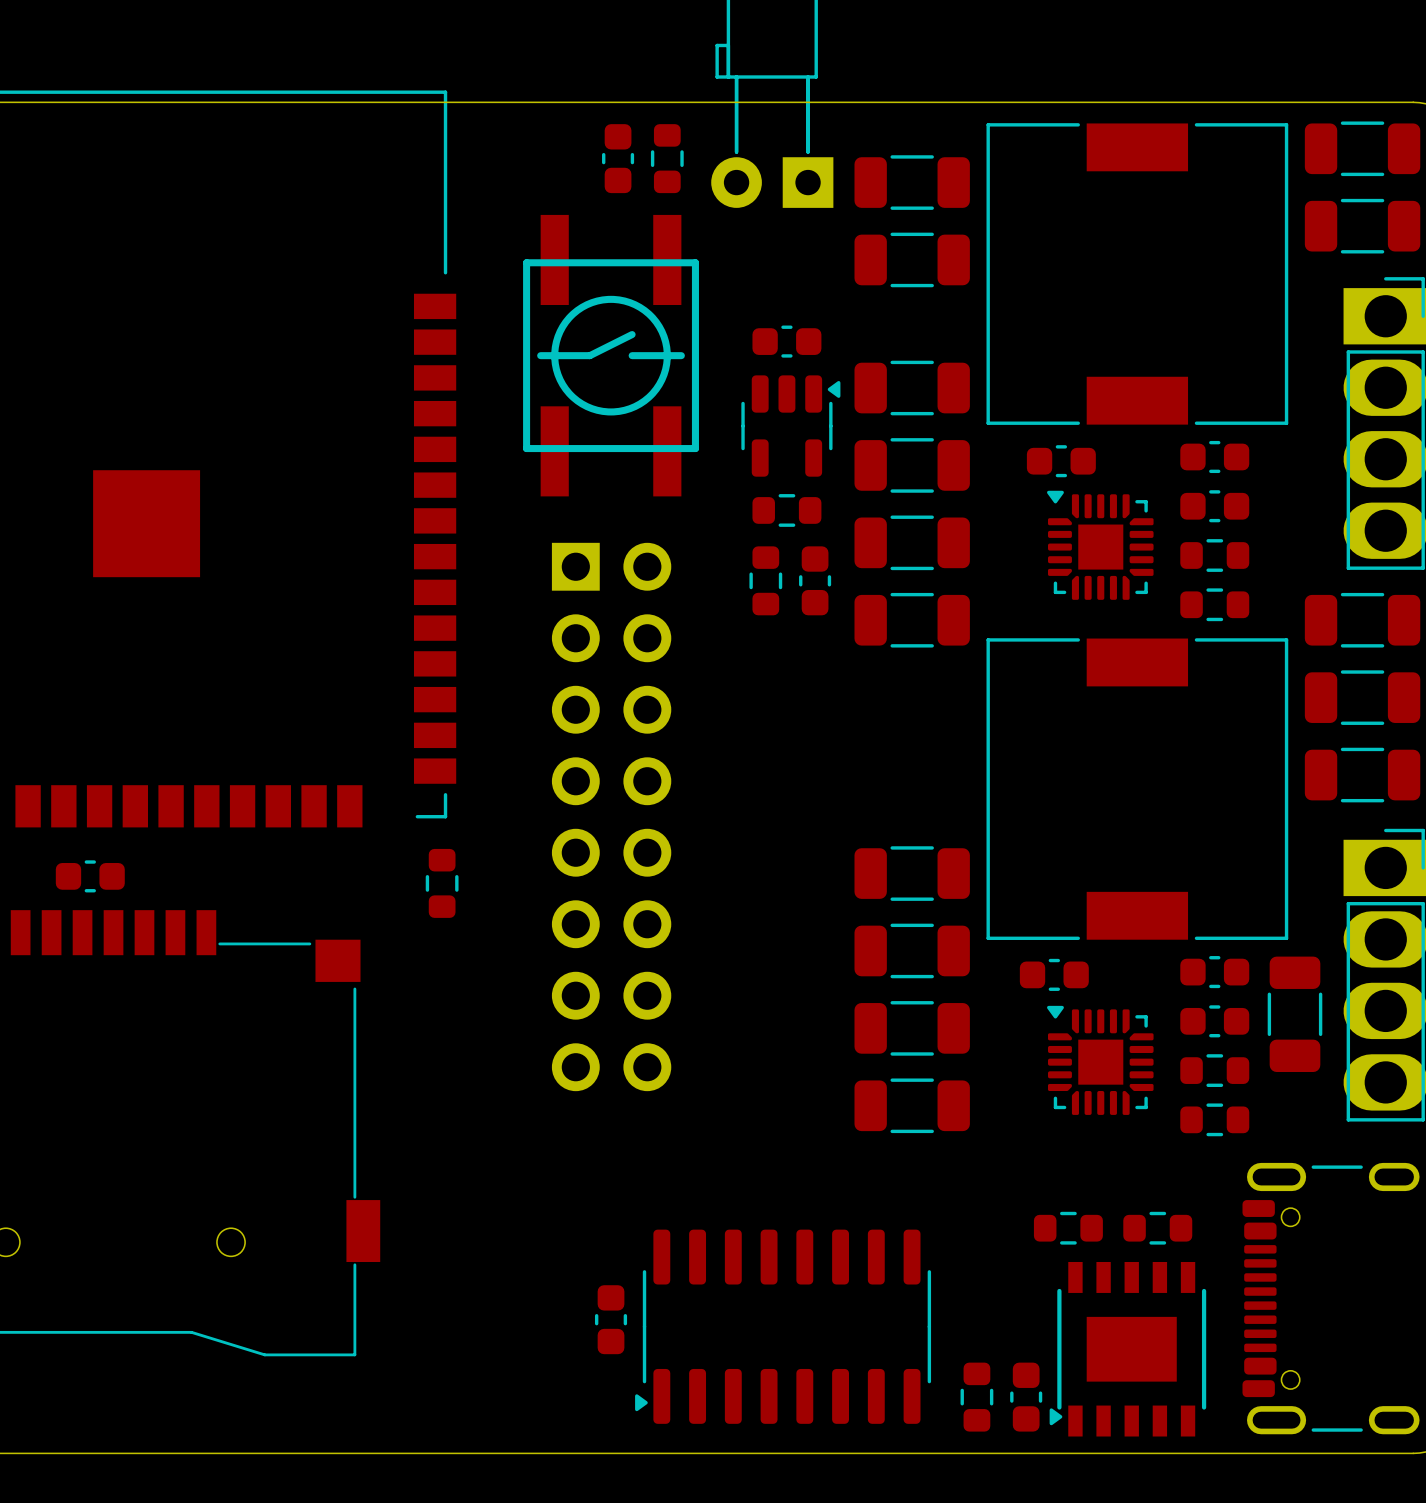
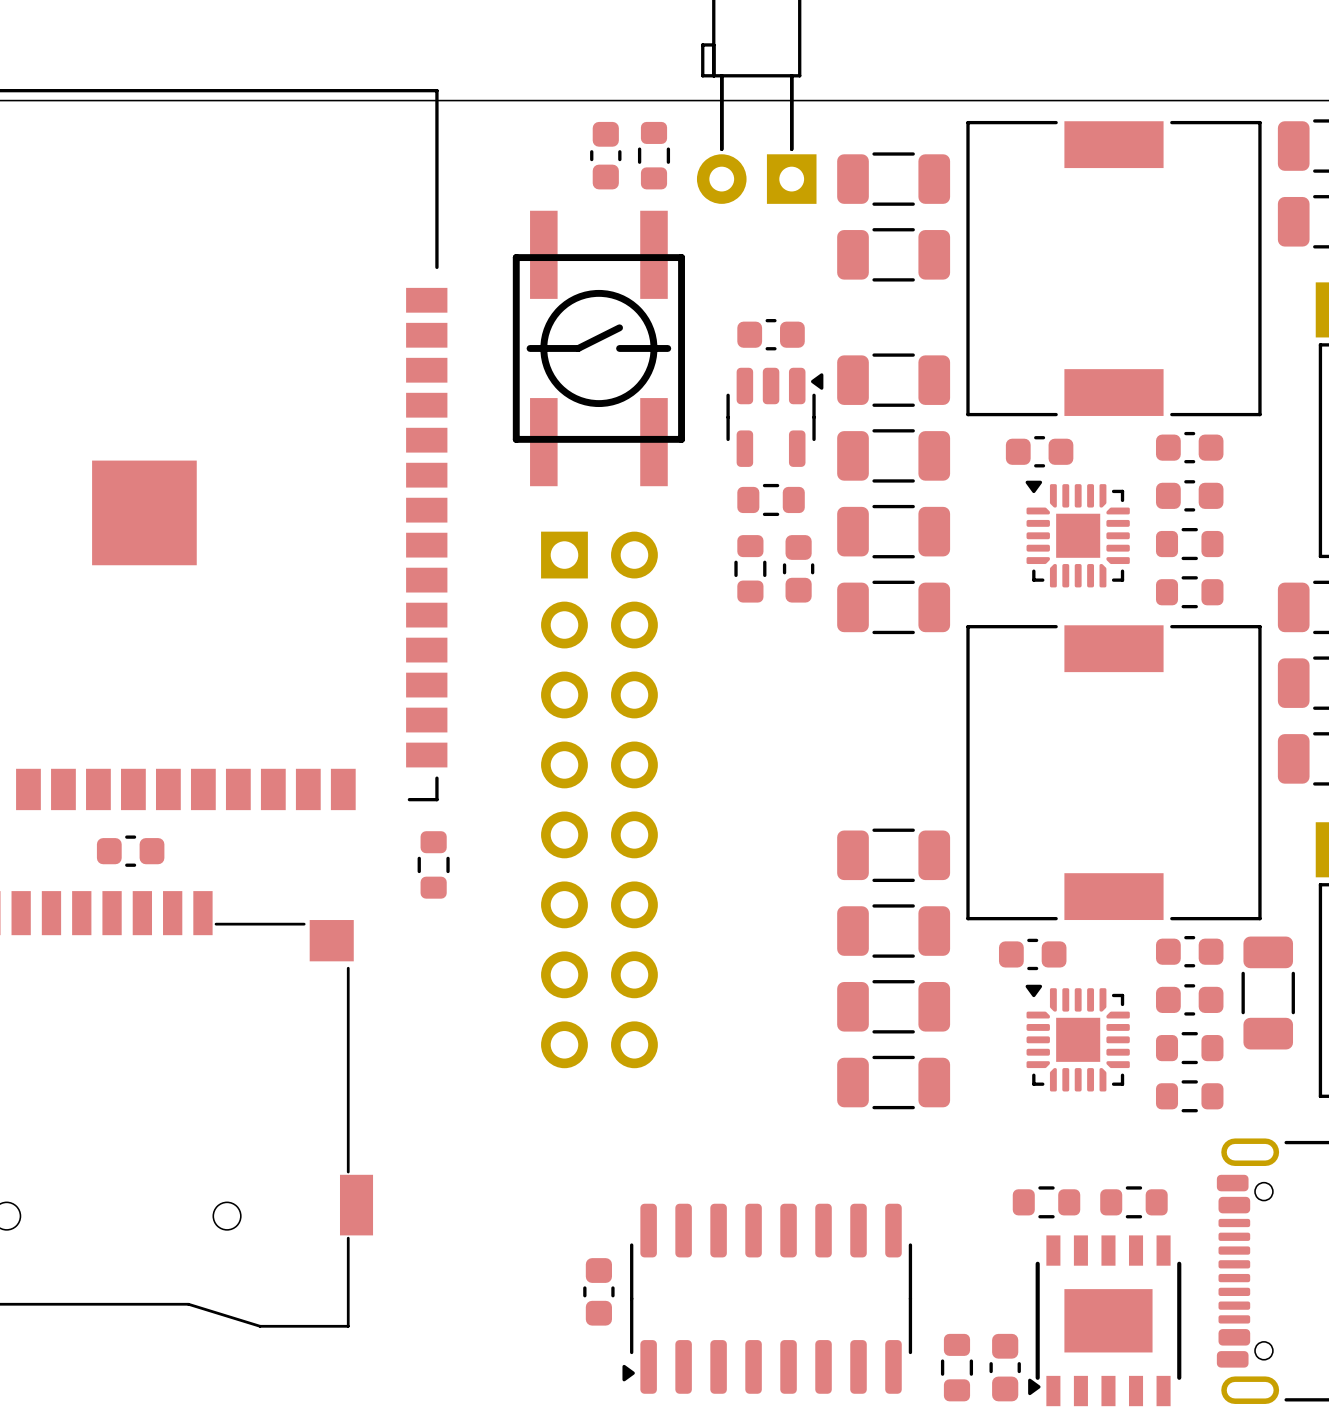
part position: (90, 876) -> (130, 851)

